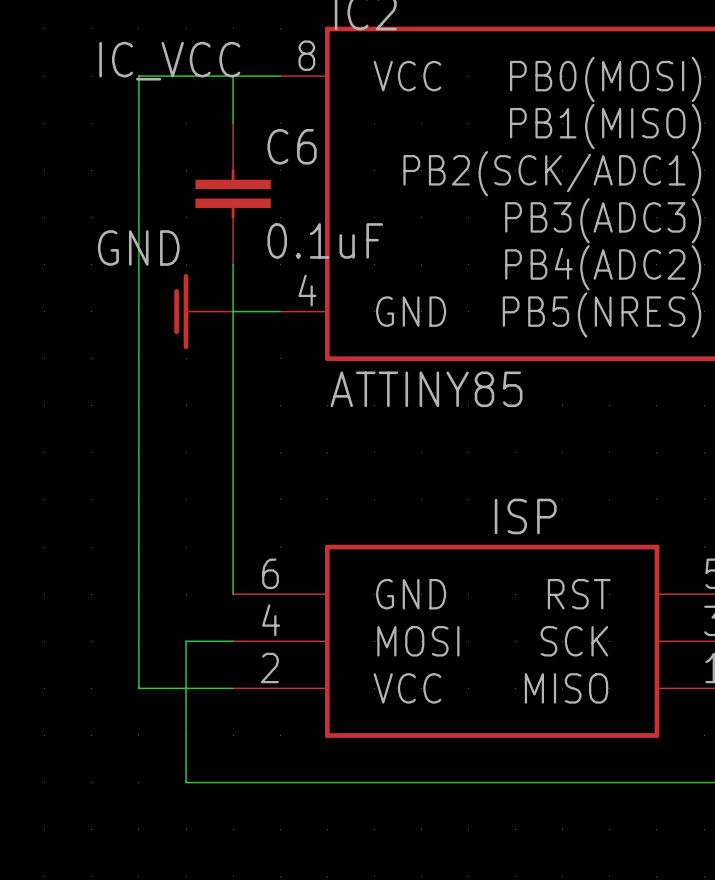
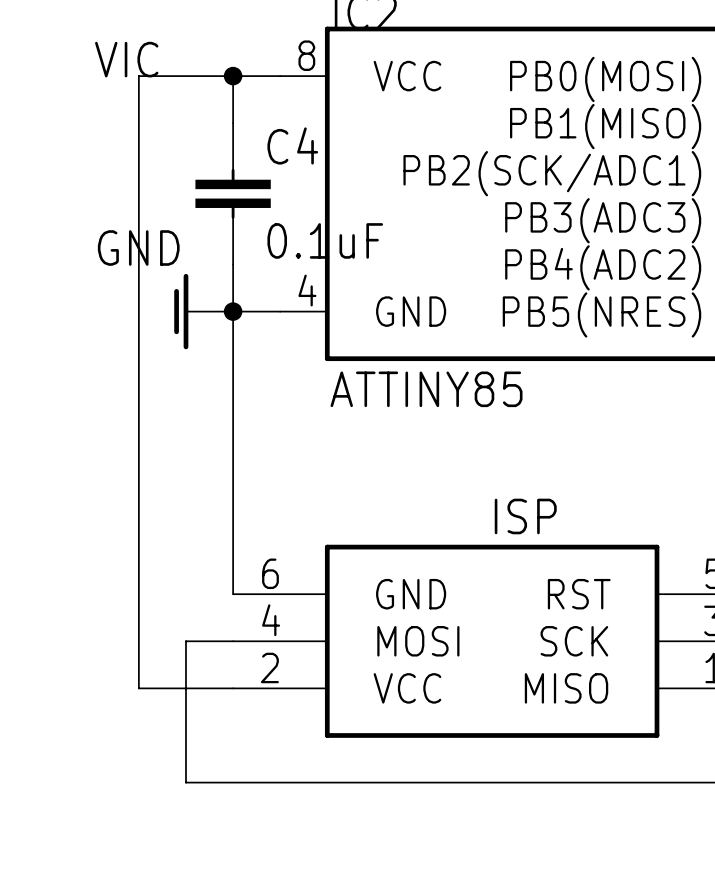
label: IC_VCC (169, 61) -> VIC (126, 59)
junction: none -> (233, 76)
C6 name: C6 (292, 146) -> C4 (292, 145)
junction: none -> (233, 311)

